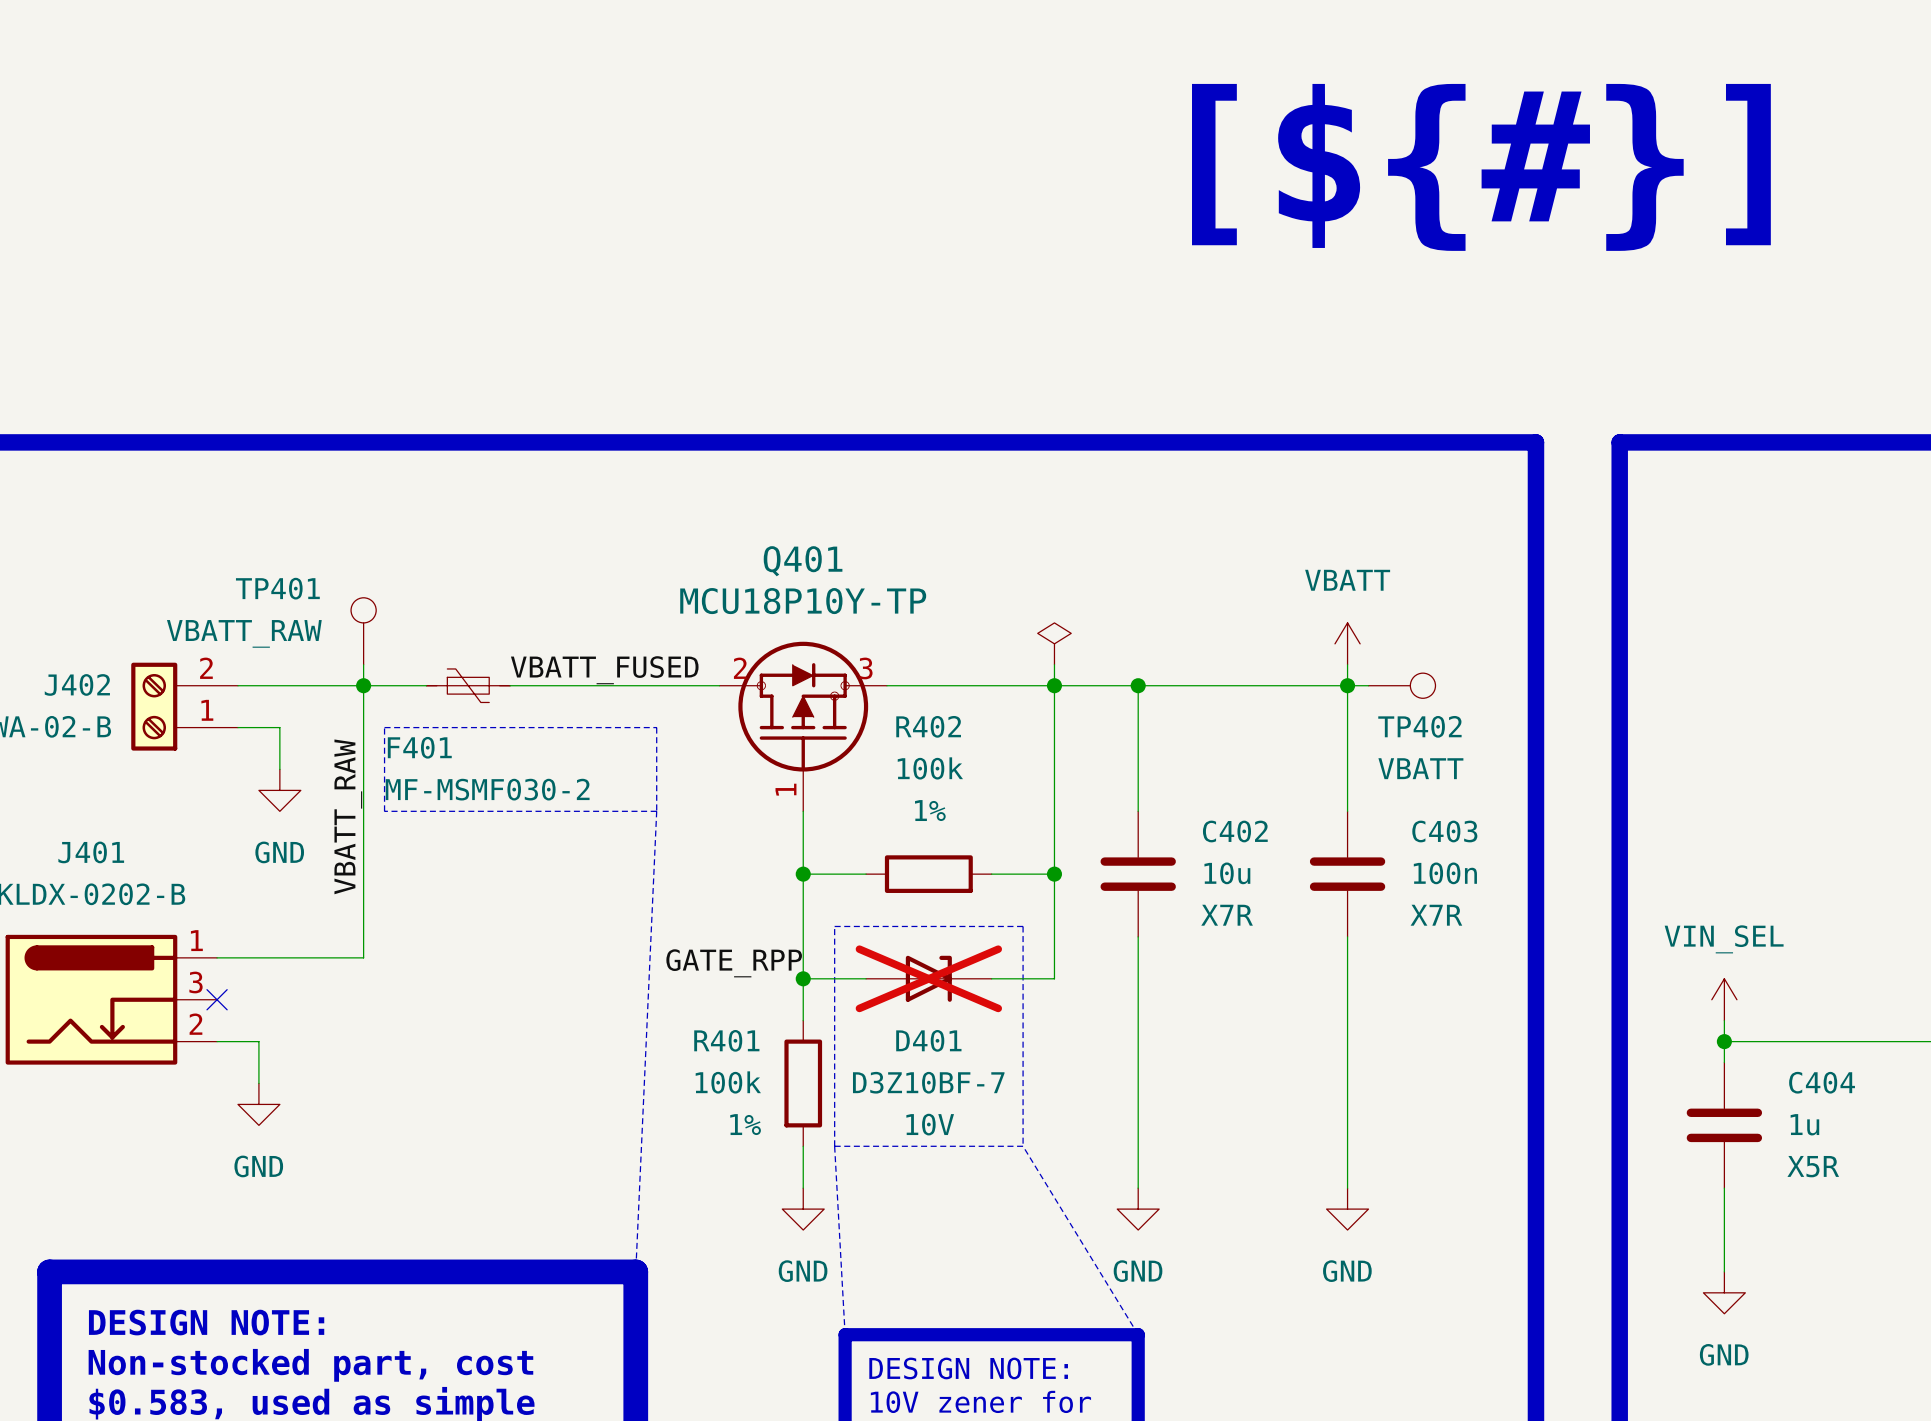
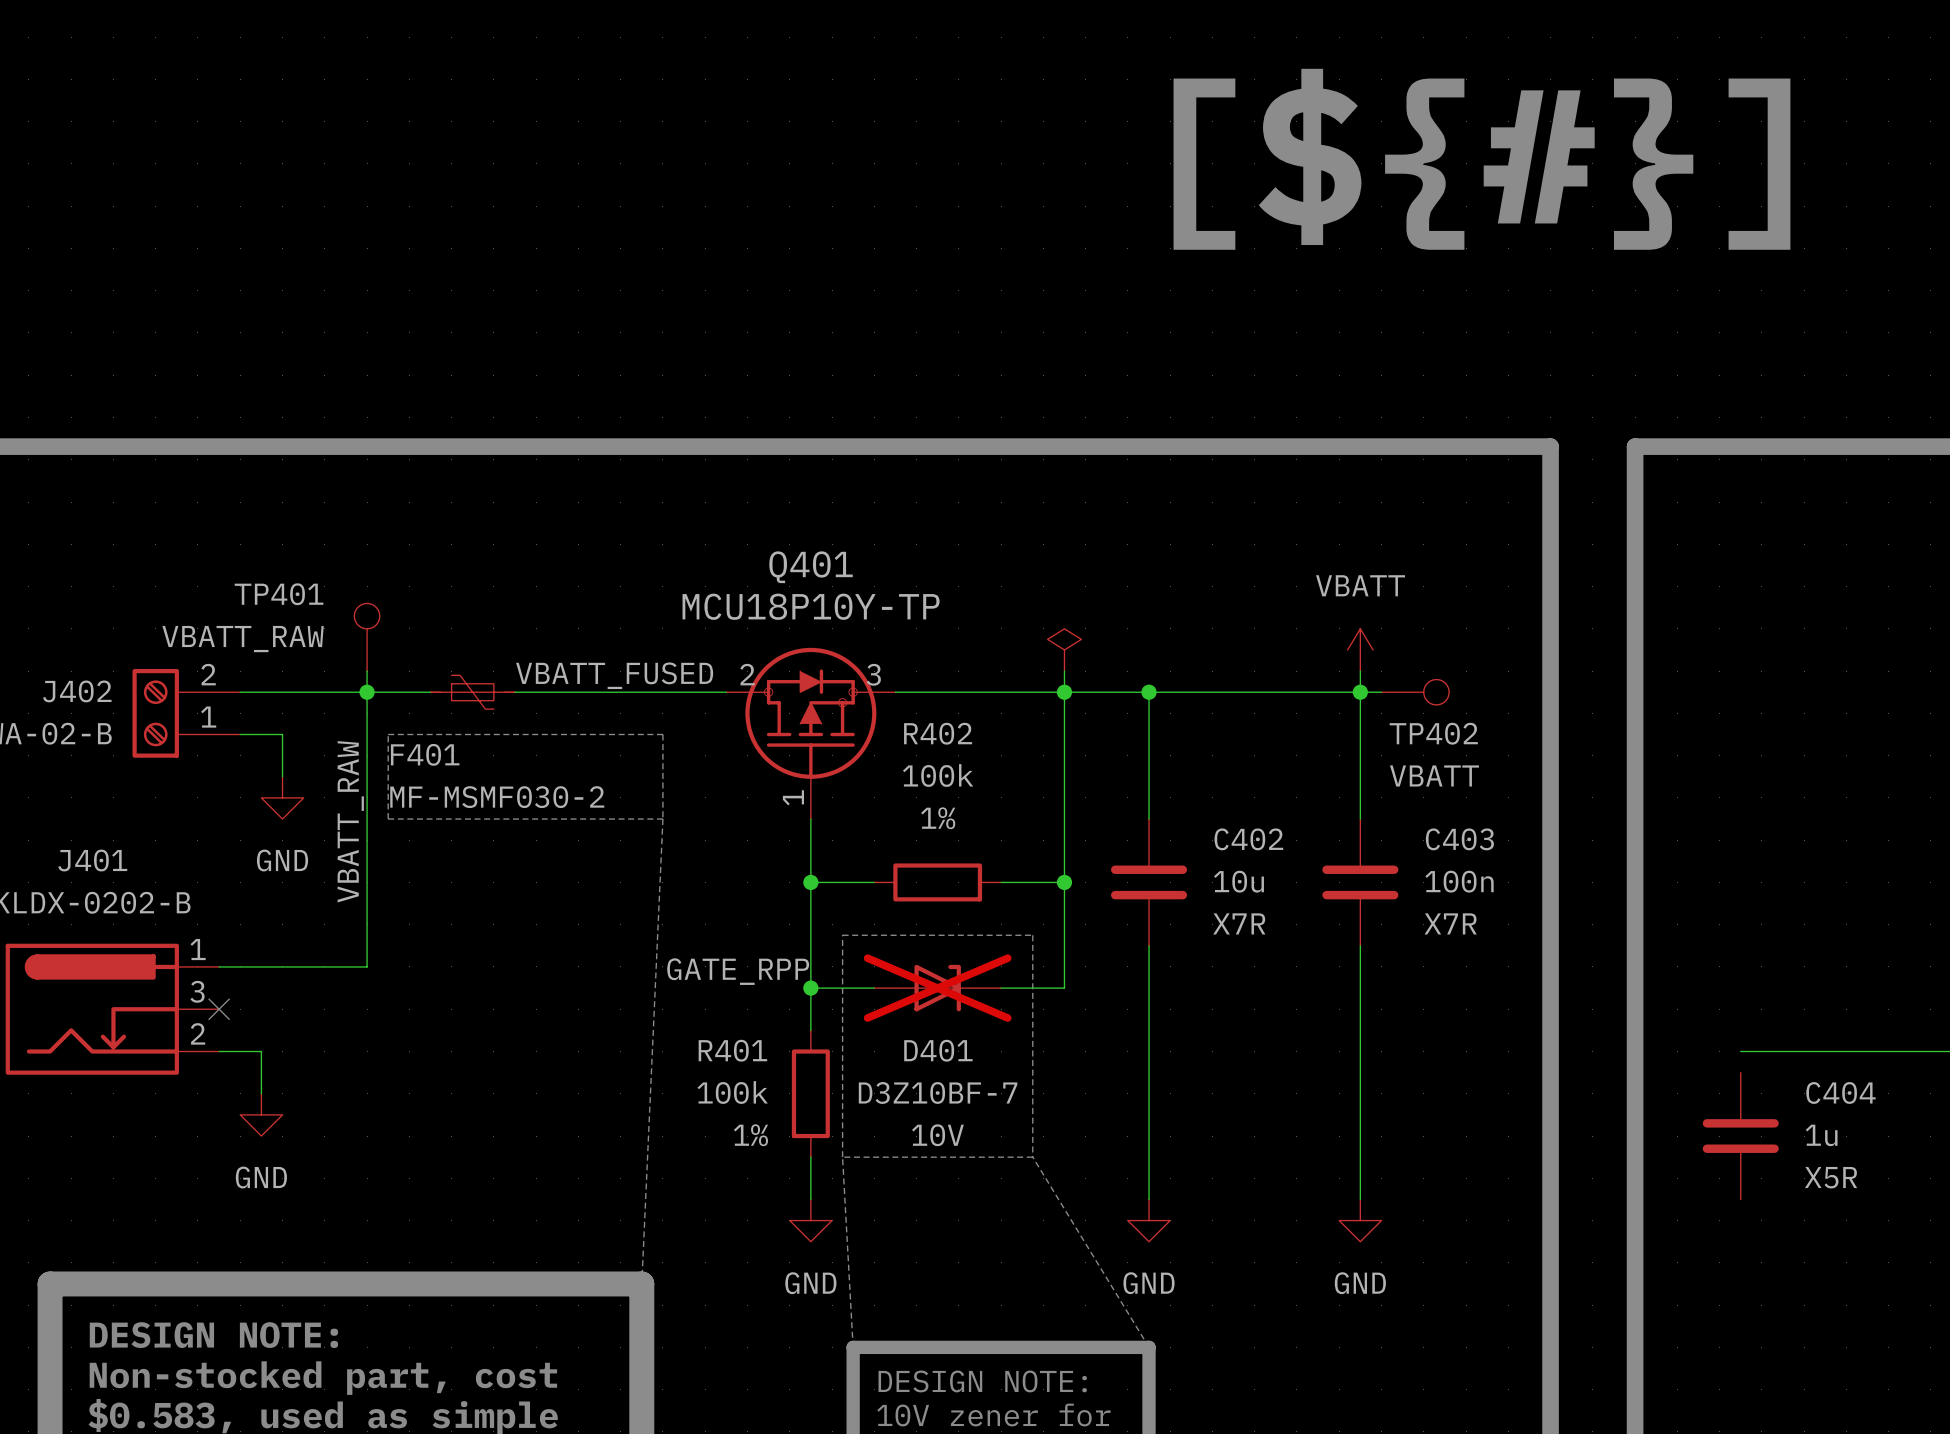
power symbol: VIN_SEL (1724, 999) -> none
wire: (1724, 1020) (1724, 1062) -> none
junction: (1724, 1041) -> none
wire: (1724, 1188) (1724, 1271) -> none
power symbol: GND (1724, 1292) -> none

